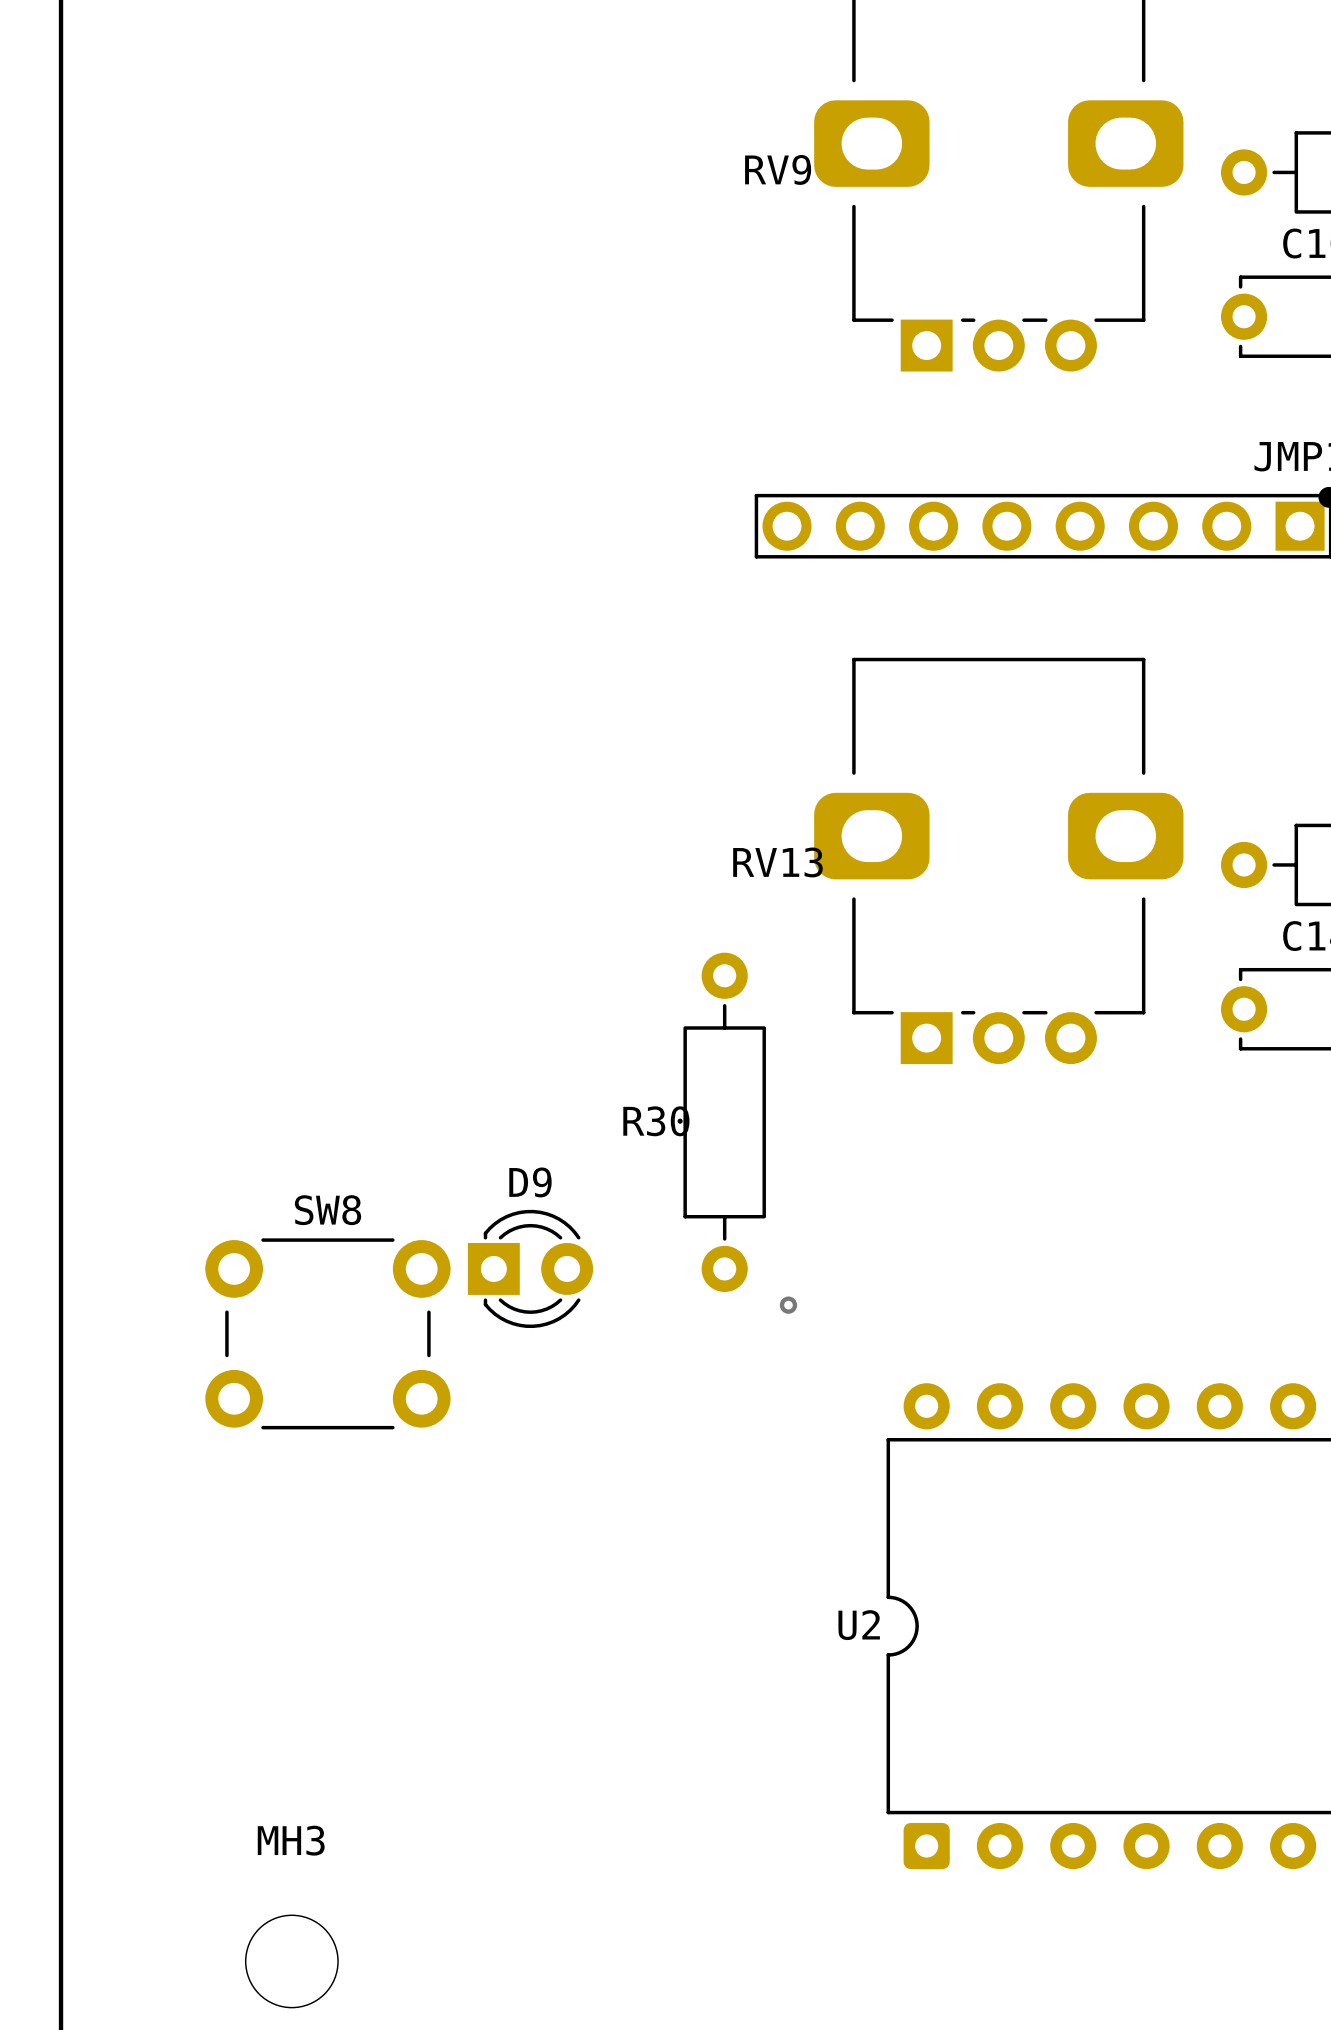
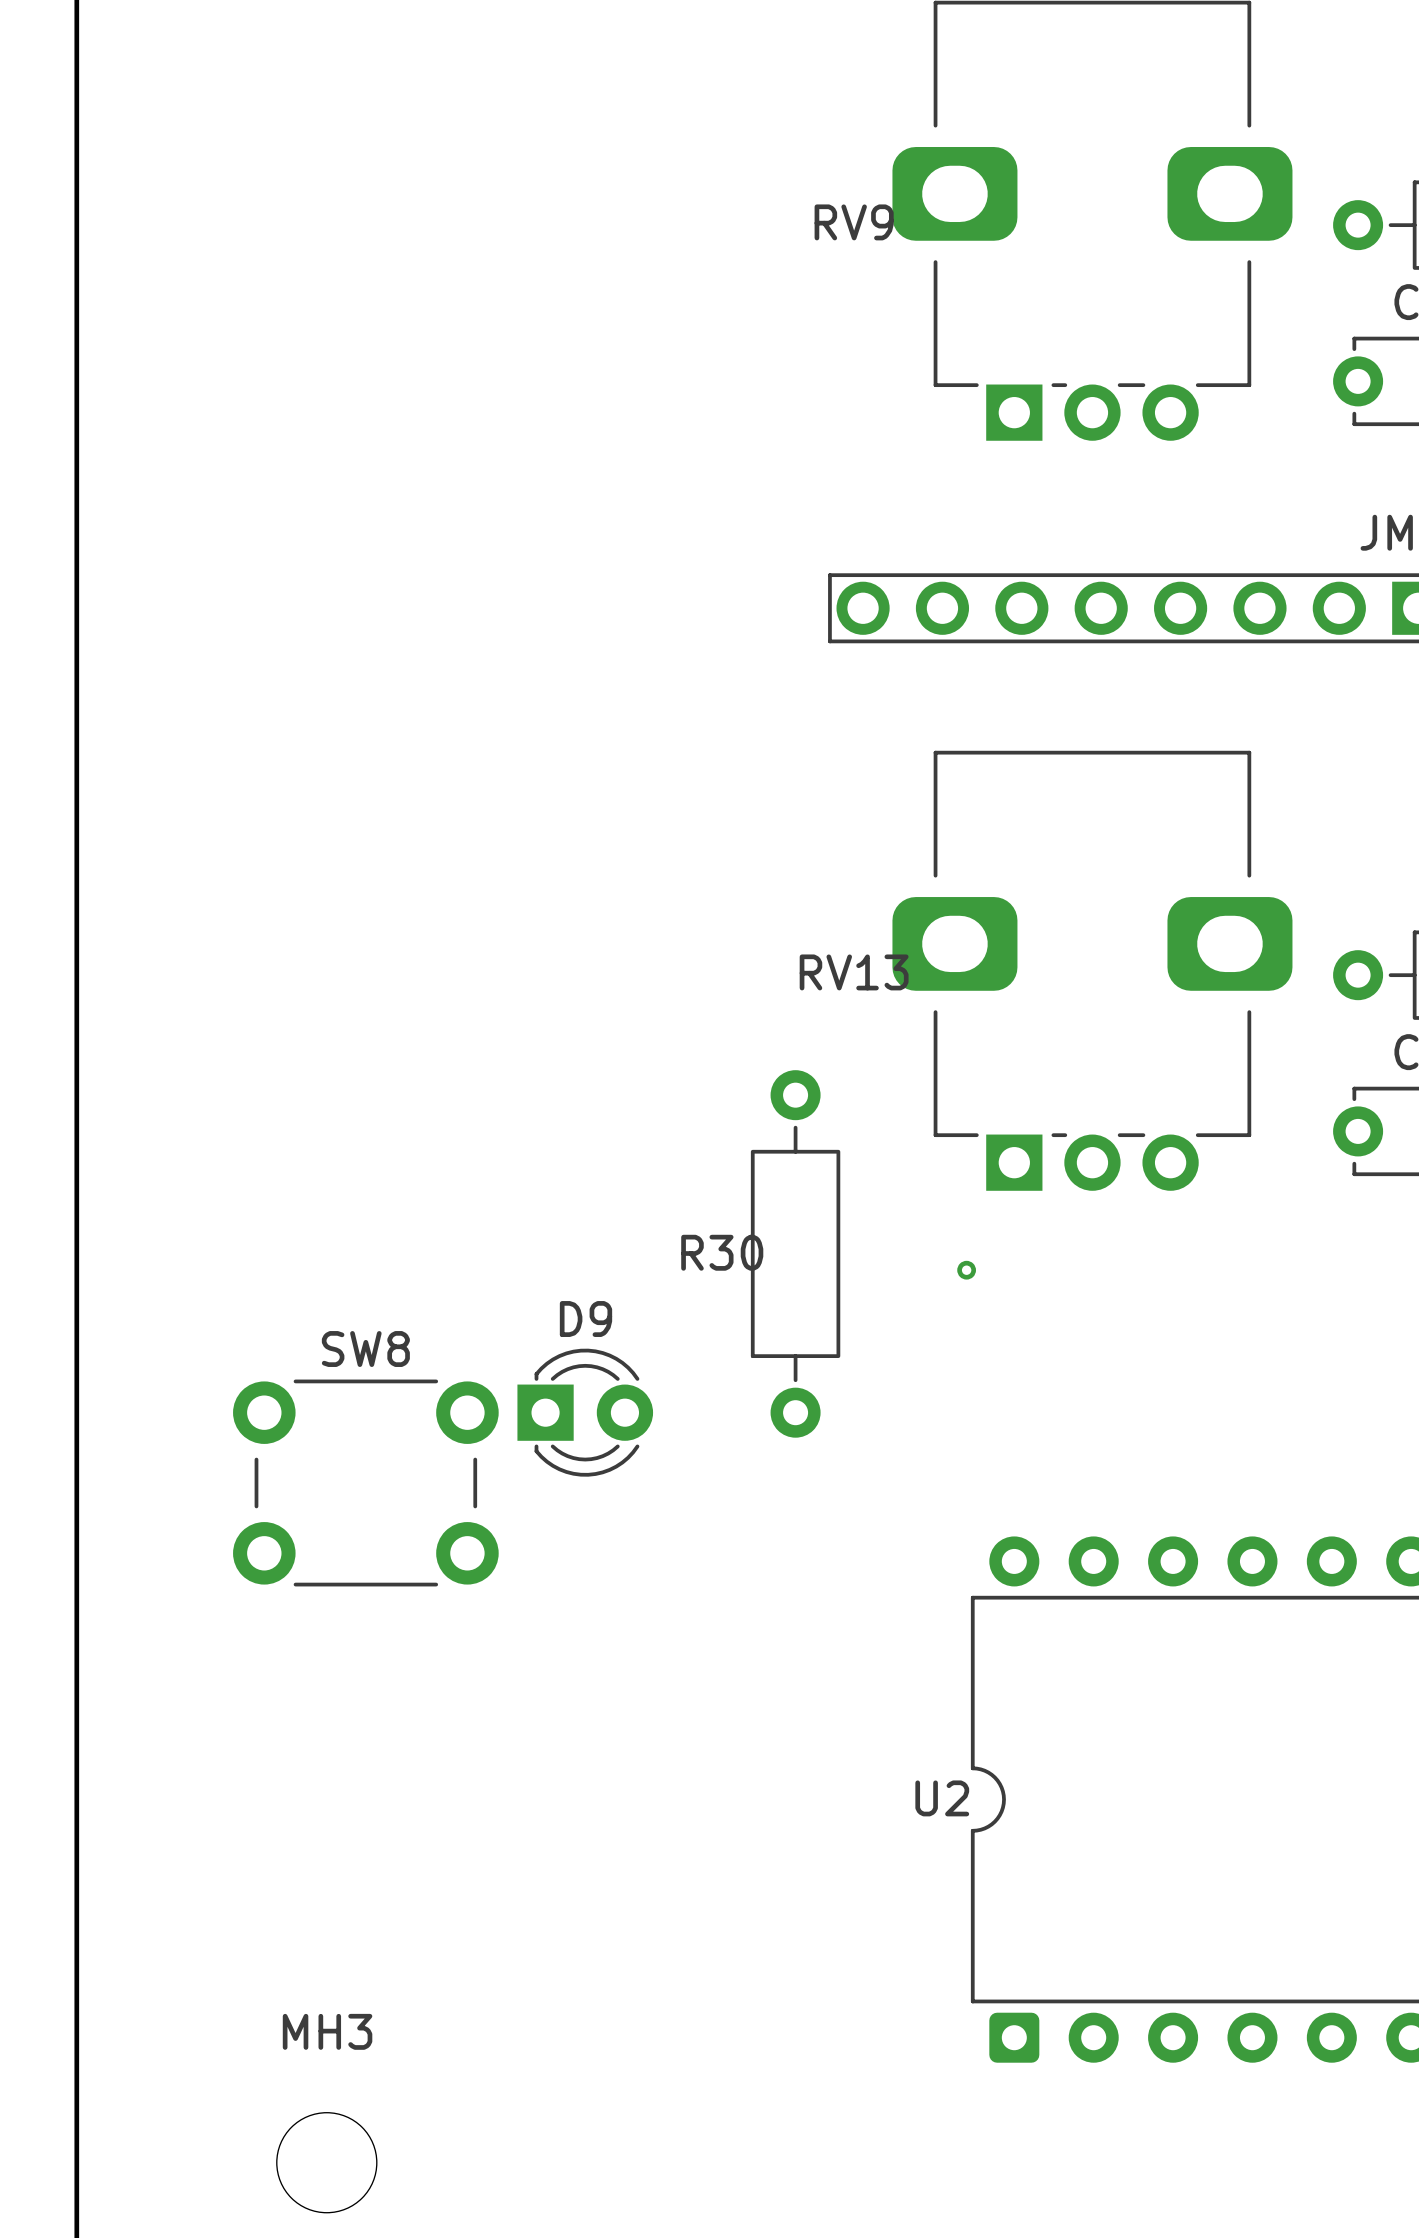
via: none -> (966, 1270)
via: (788, 1305) -> none

